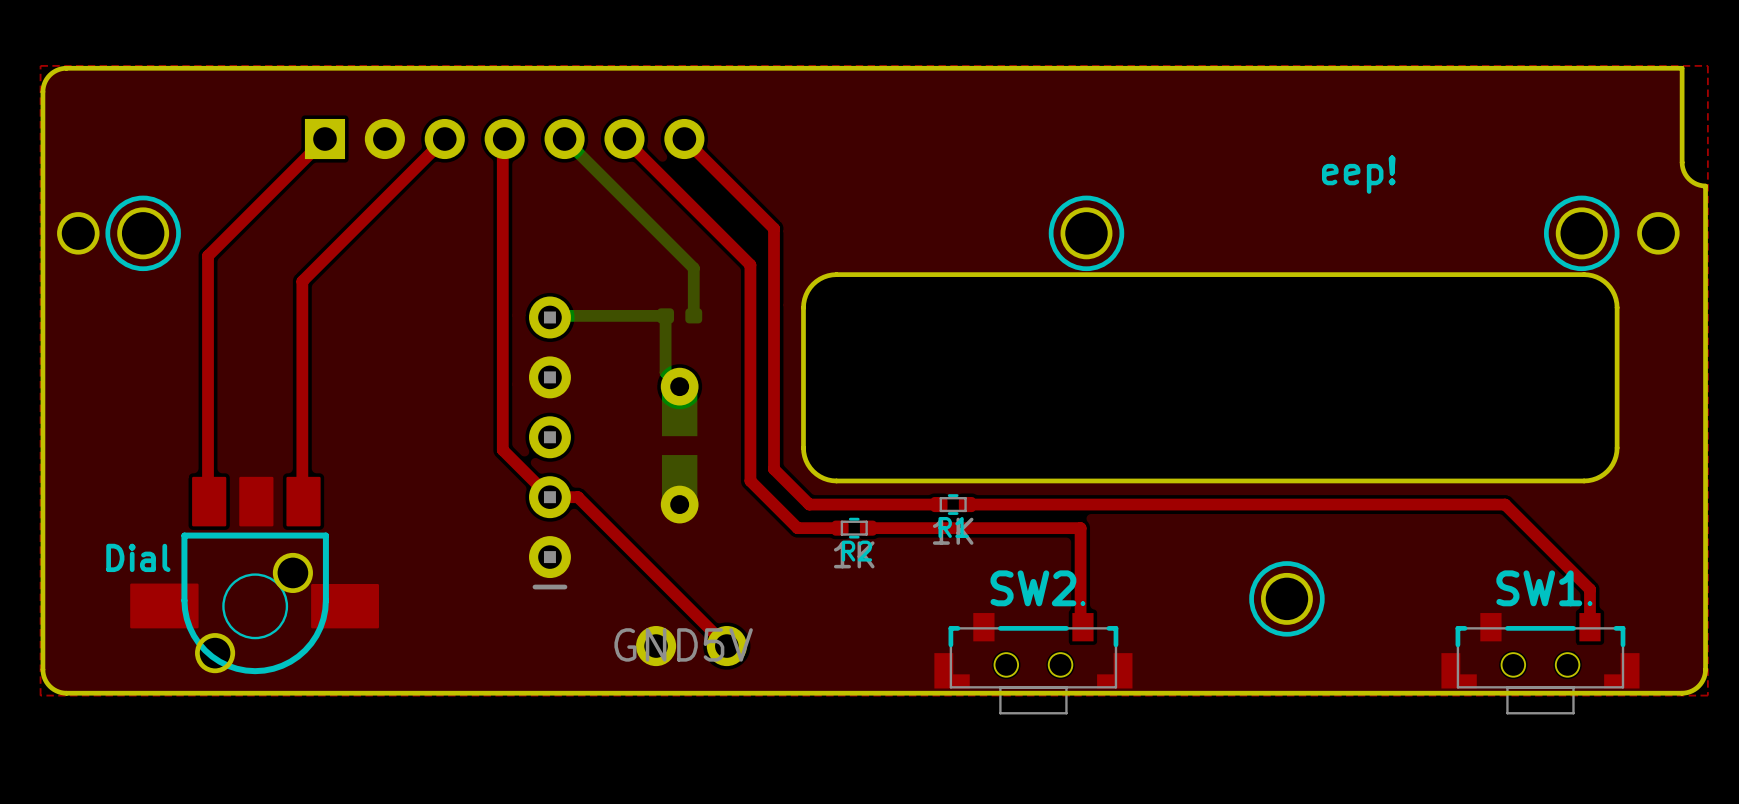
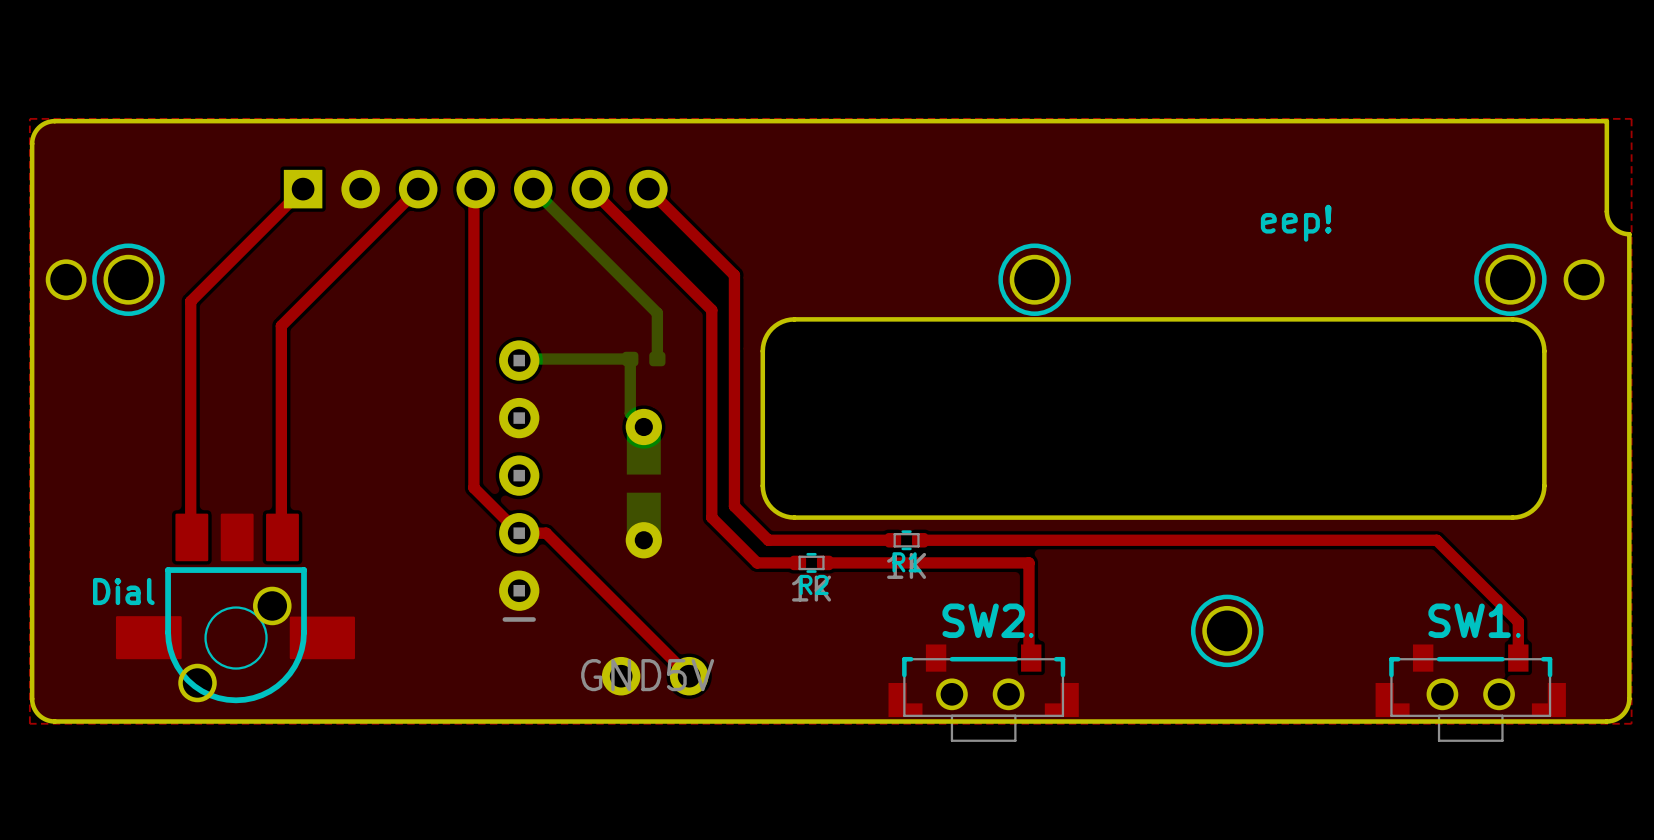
SW2 footprint: [934, 601, 1133, 715] -> [888, 633, 1079, 742]
SW1 footprint: [1441, 601, 1640, 715] -> [1375, 633, 1566, 742]
round board edge: none -> [936, 678, 968, 711]
round board edge: none -> [992, 678, 1025, 711]
round board edge: none -> [1426, 678, 1459, 711]
round board edge: none -> [1483, 678, 1515, 711]

